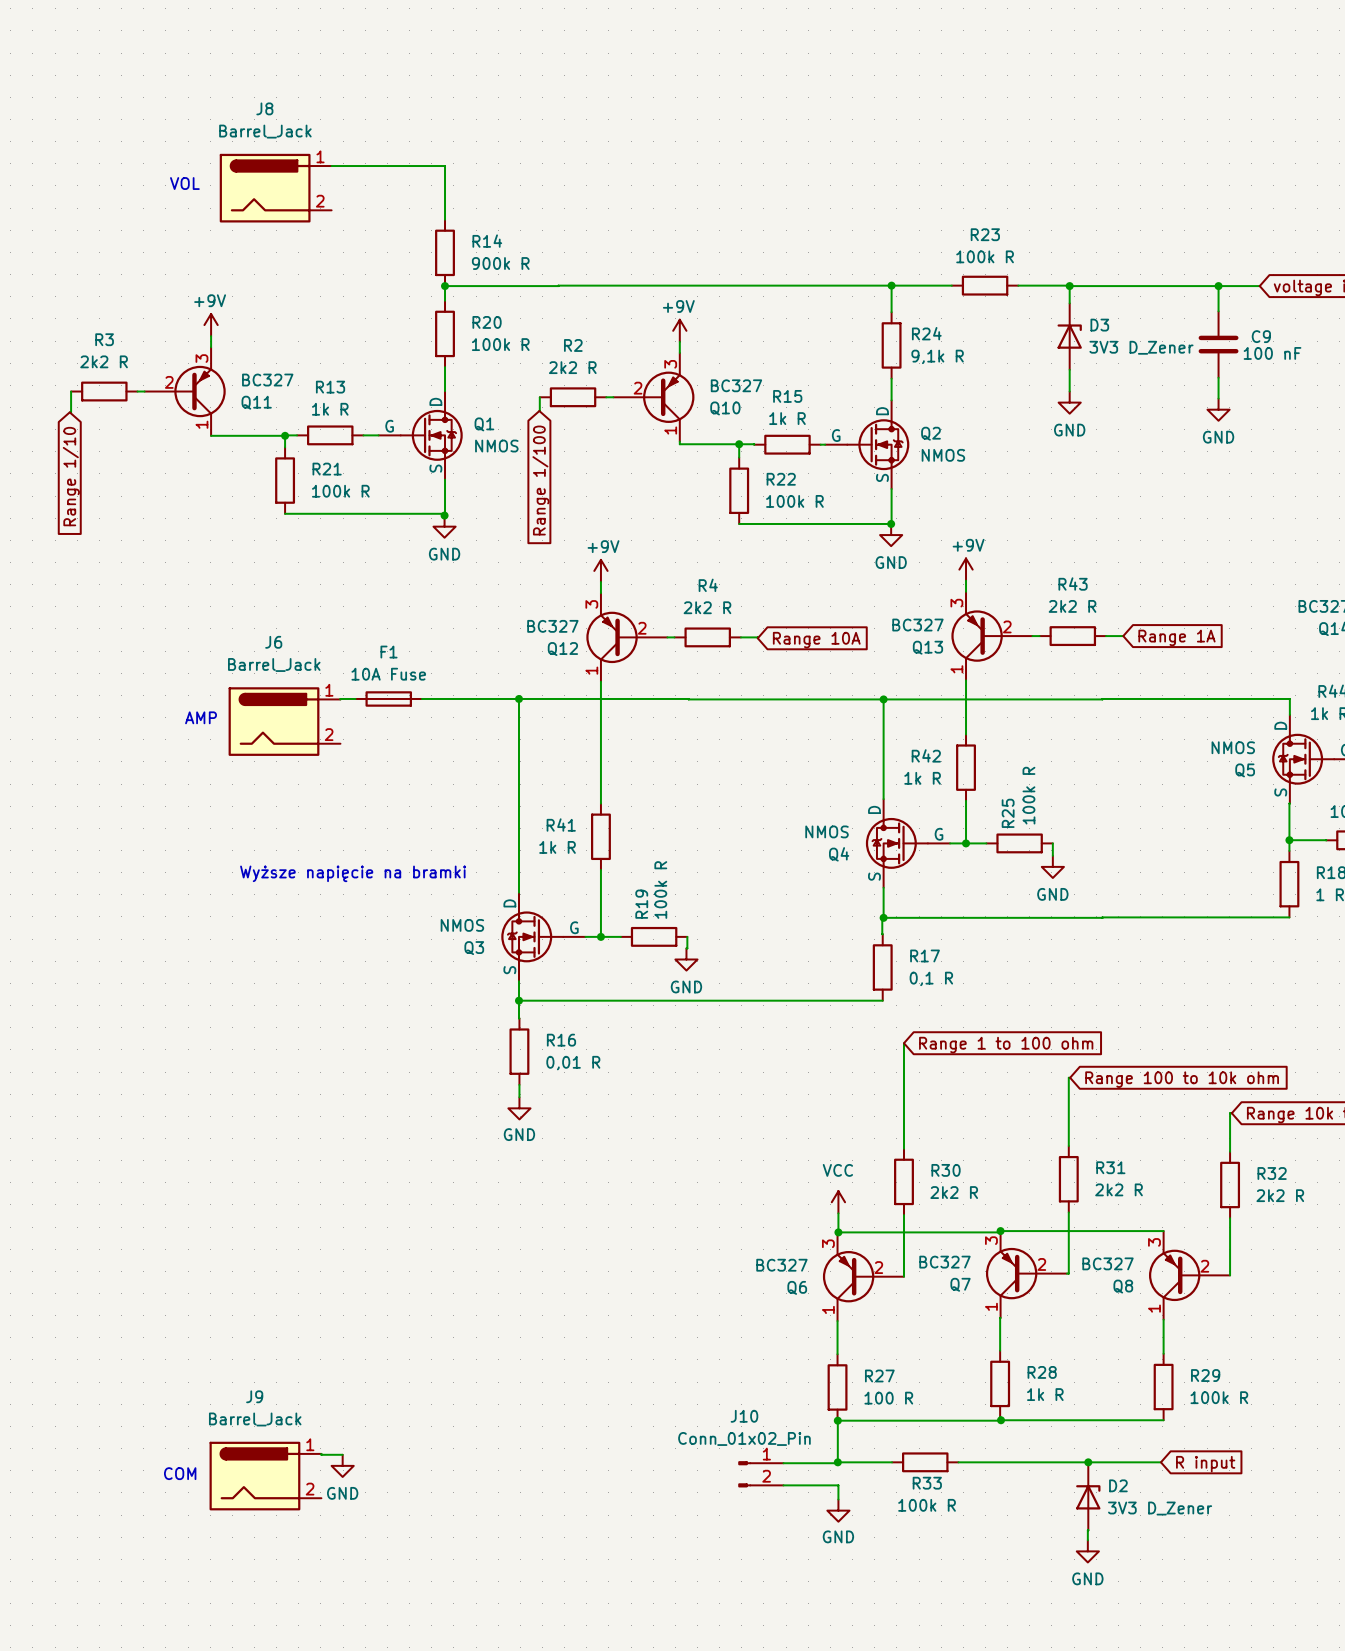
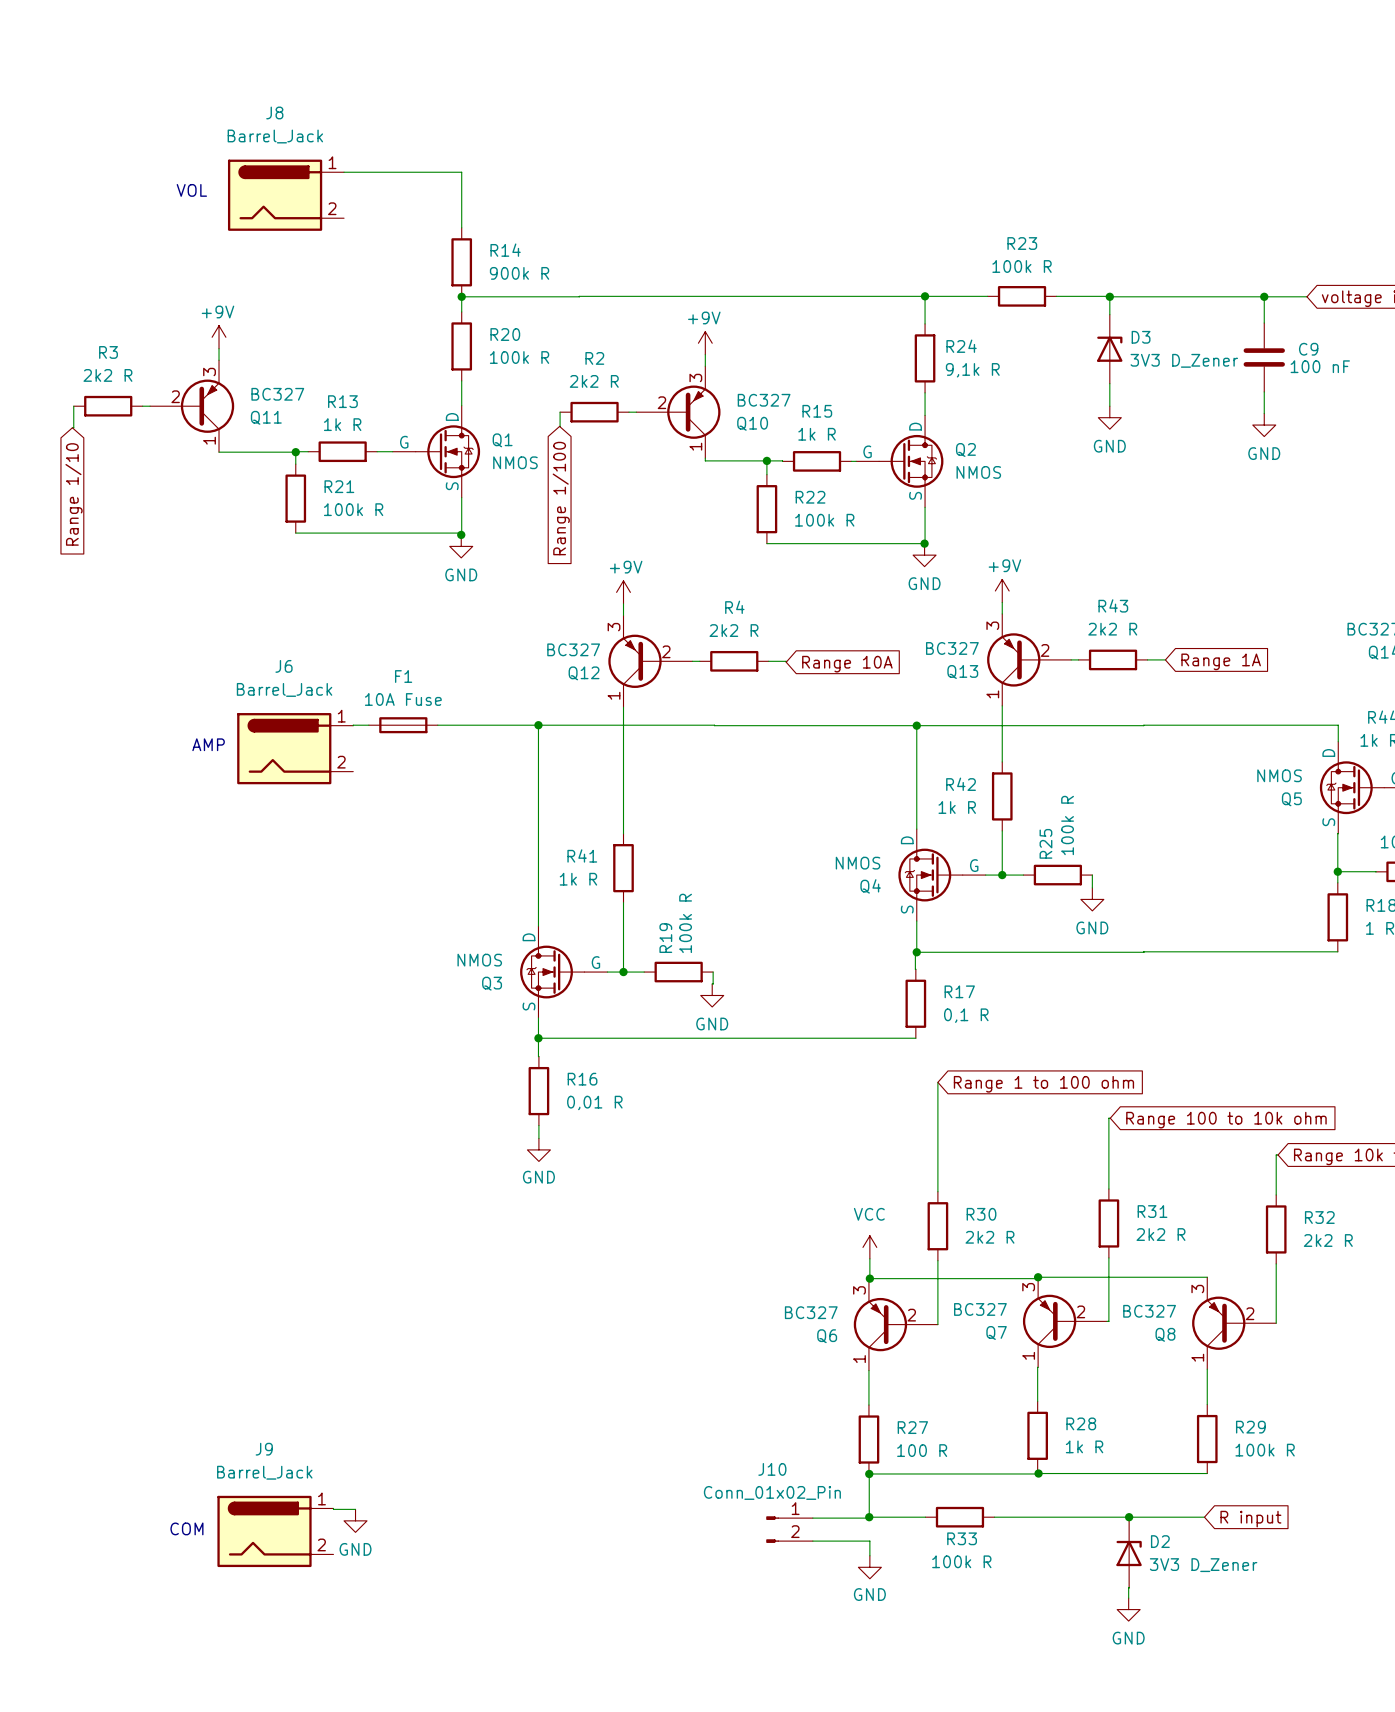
text: Wyższe napięcie na bramki (353, 873) -> none

